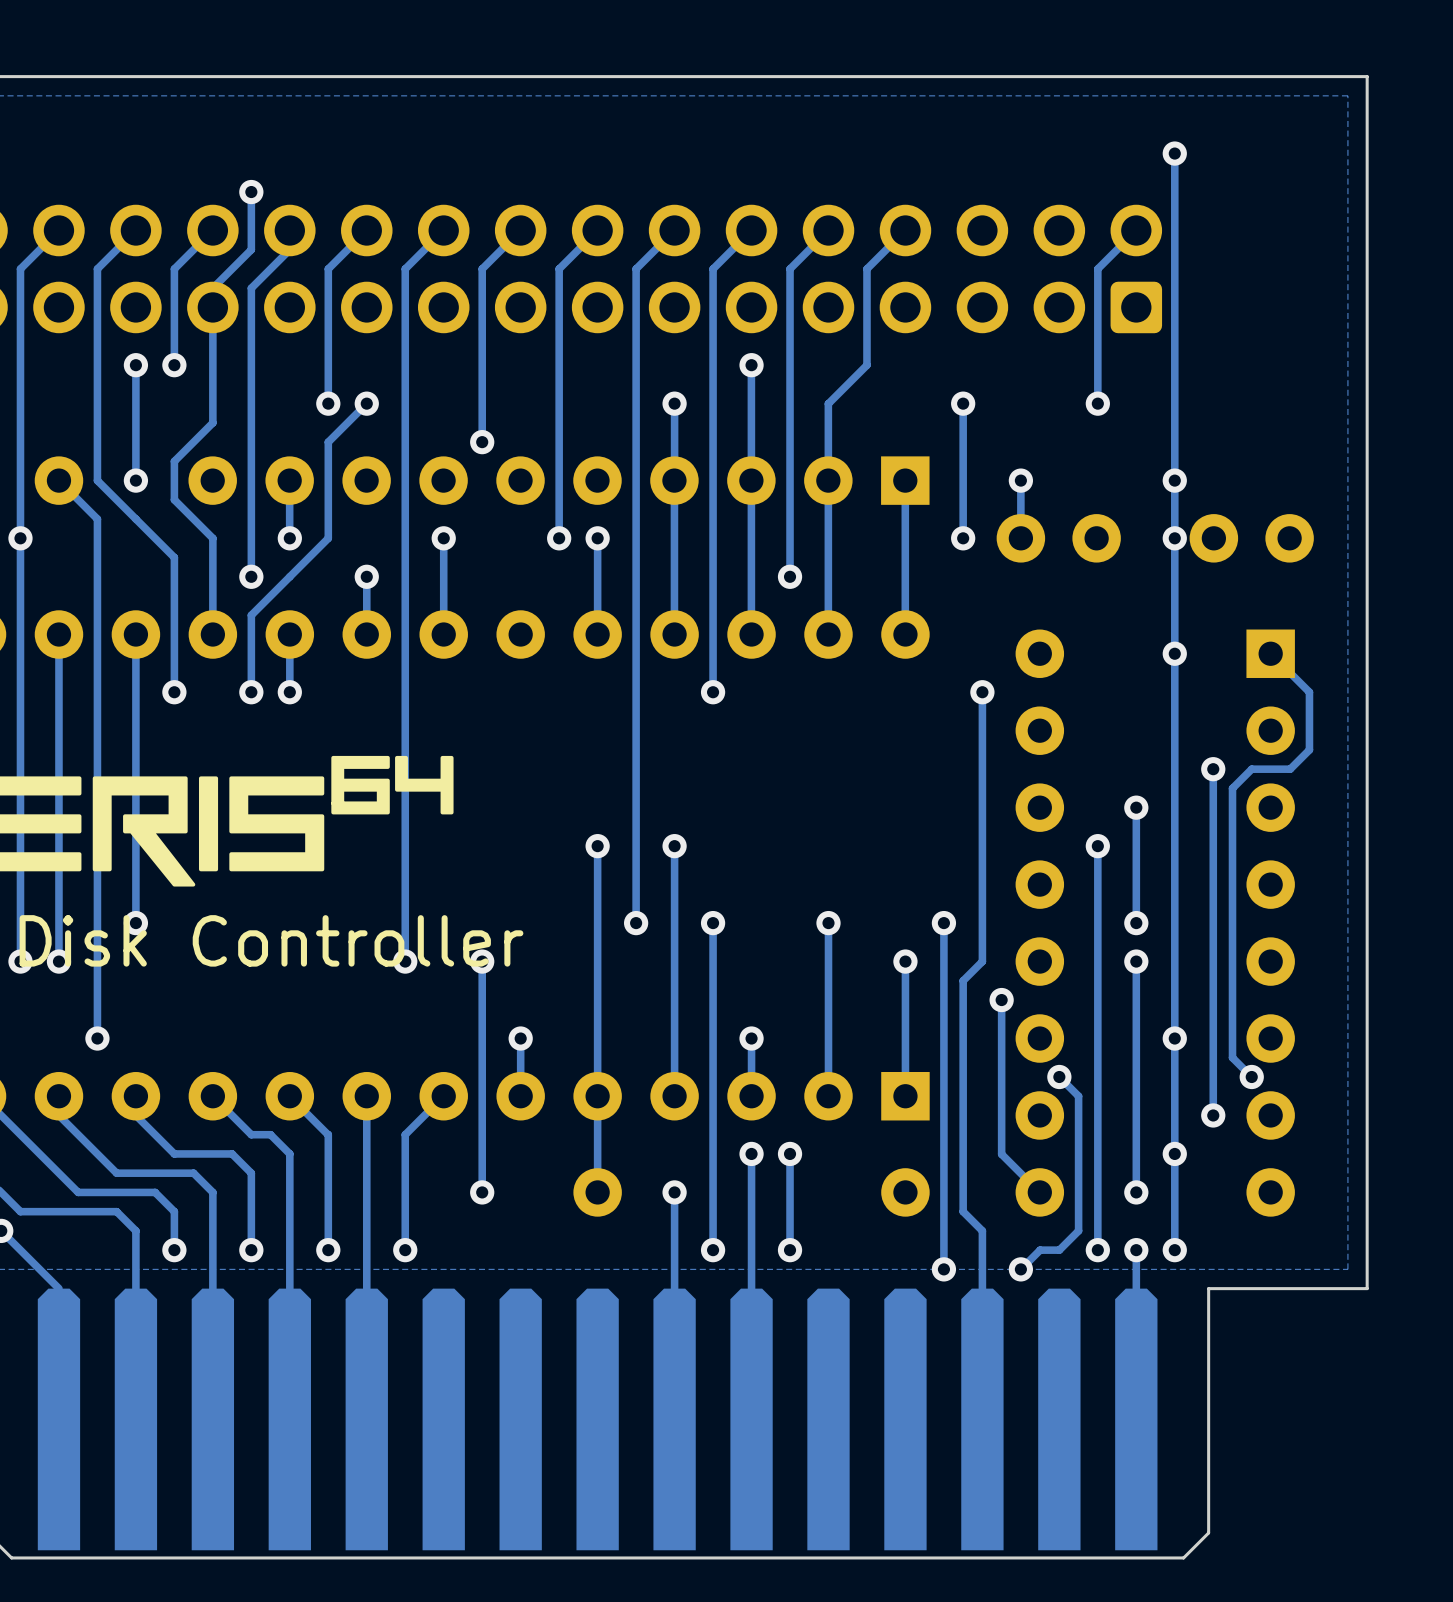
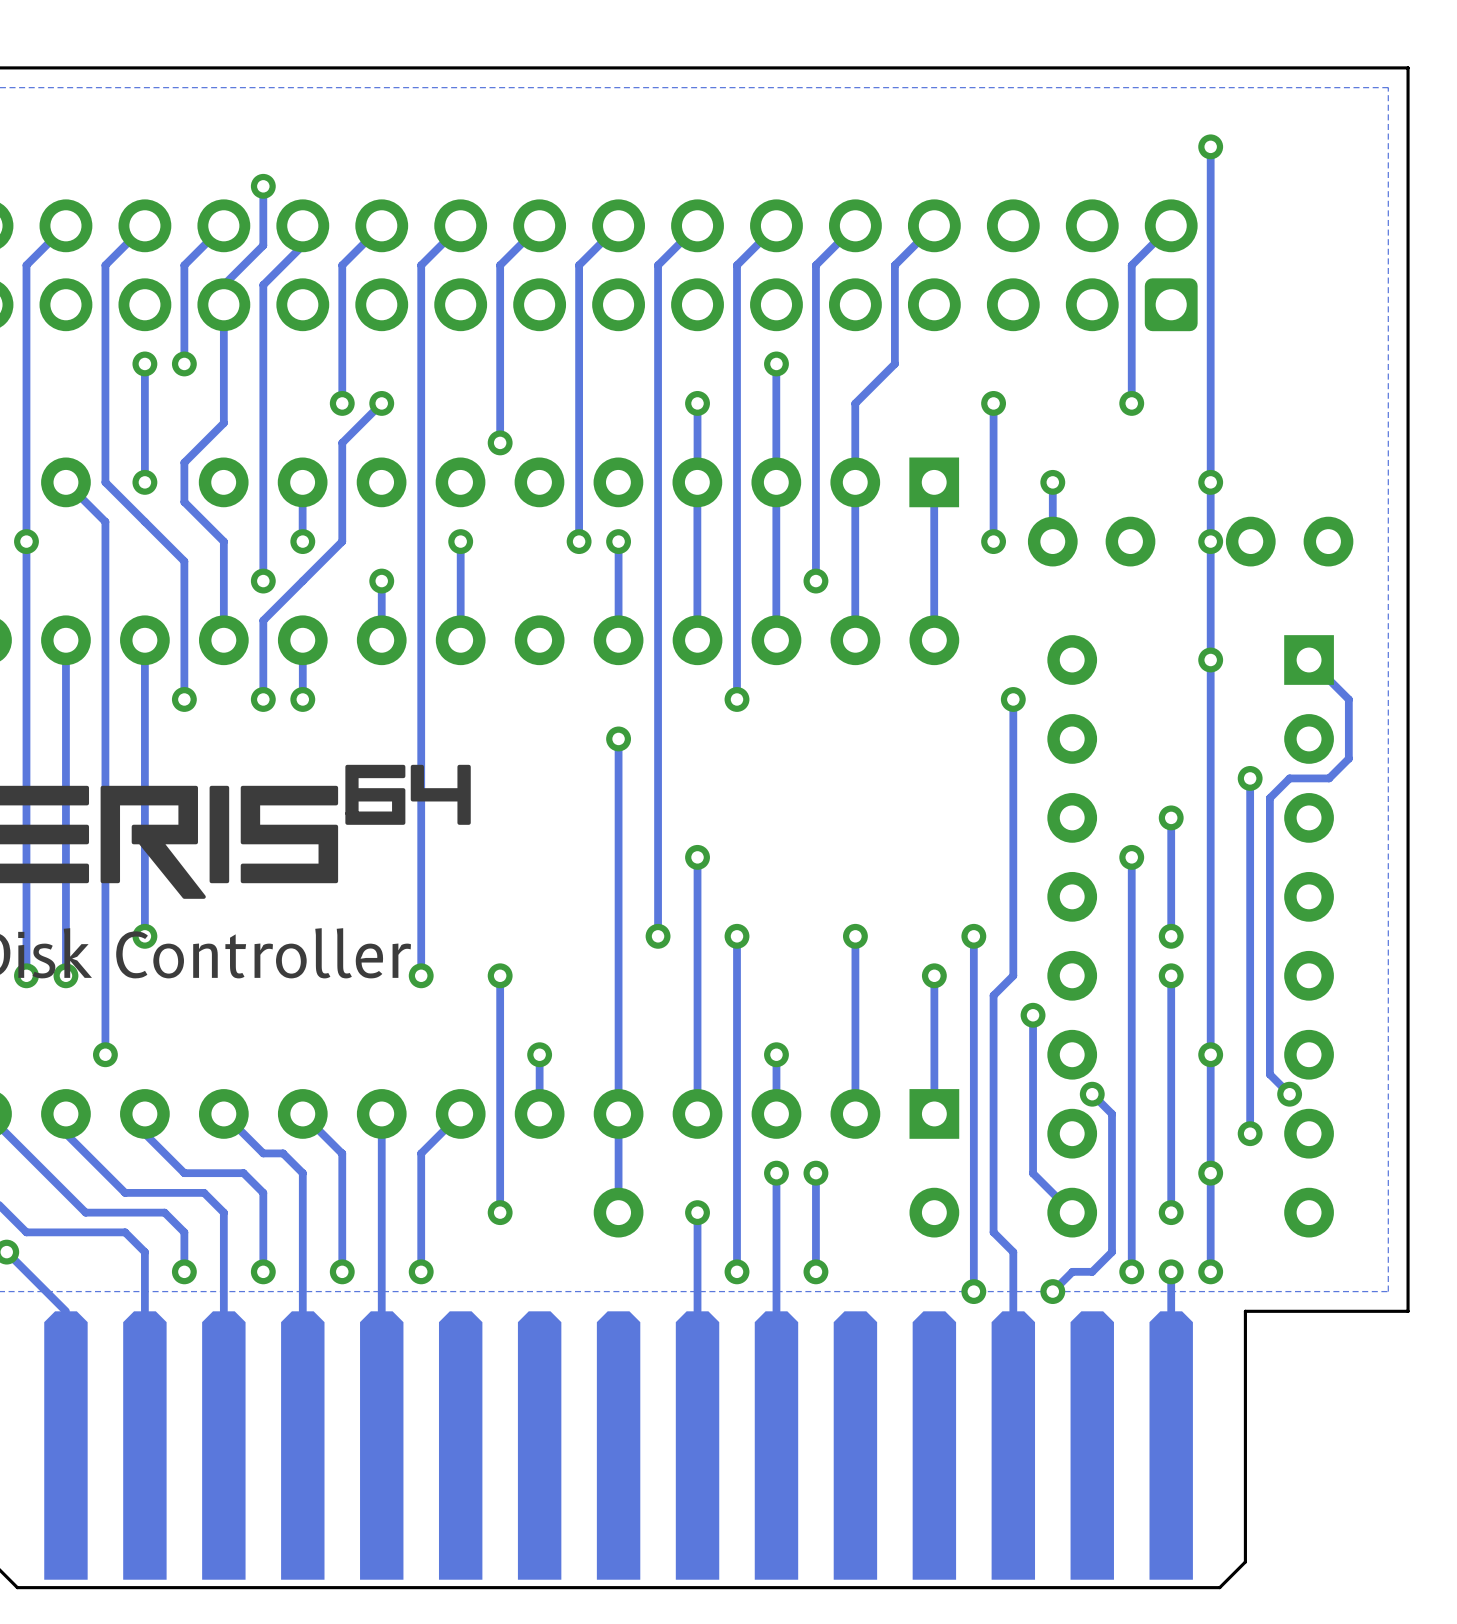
track: none -> (618, 738) (618, 857)
via position: (597, 846) -> (618, 738)

